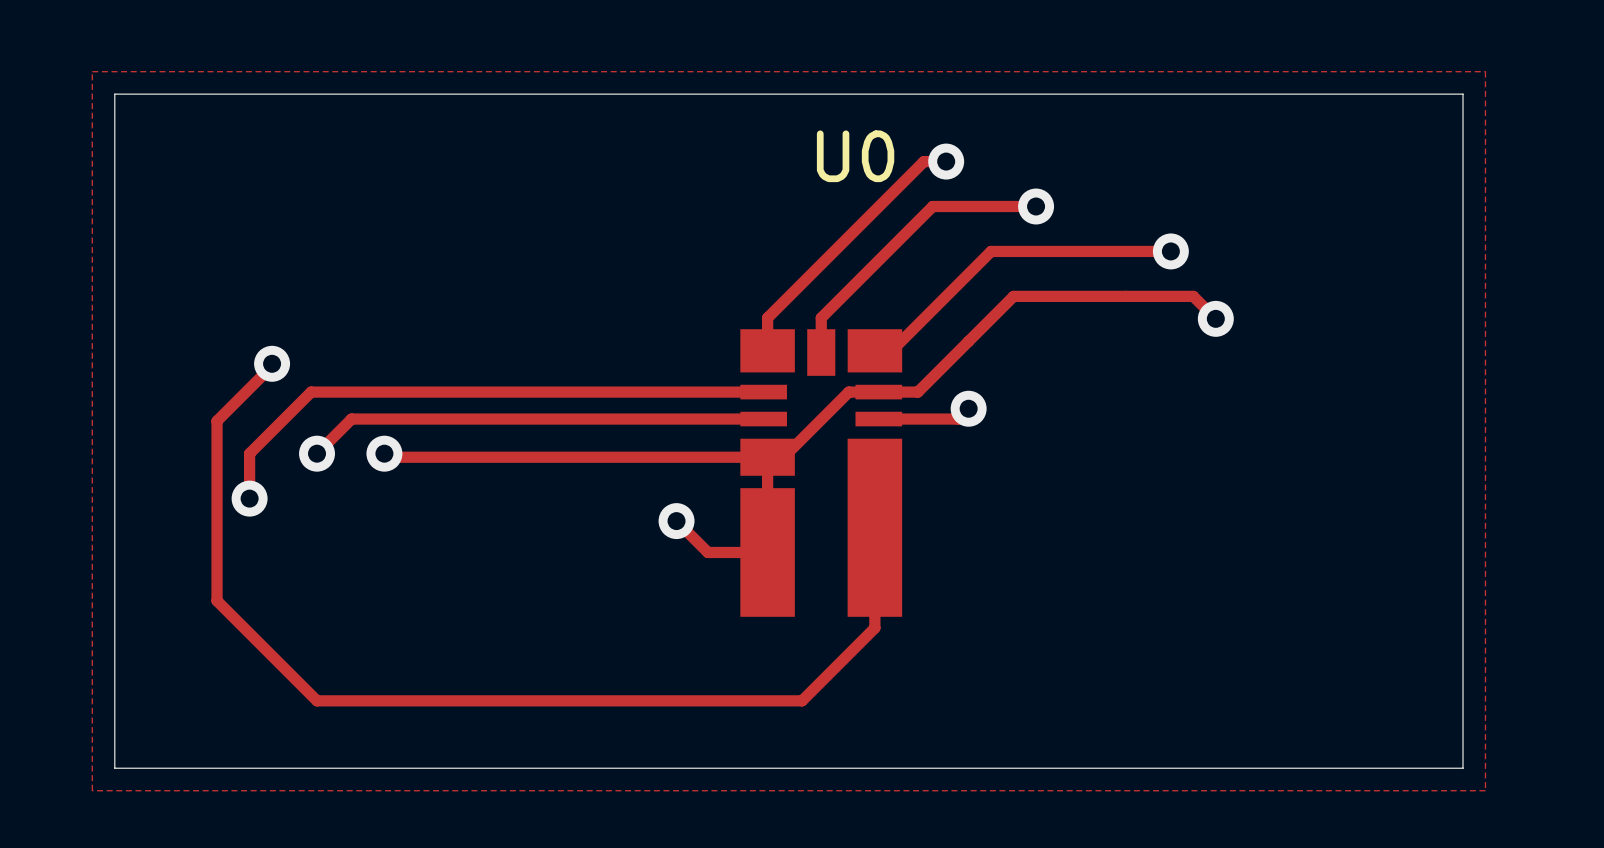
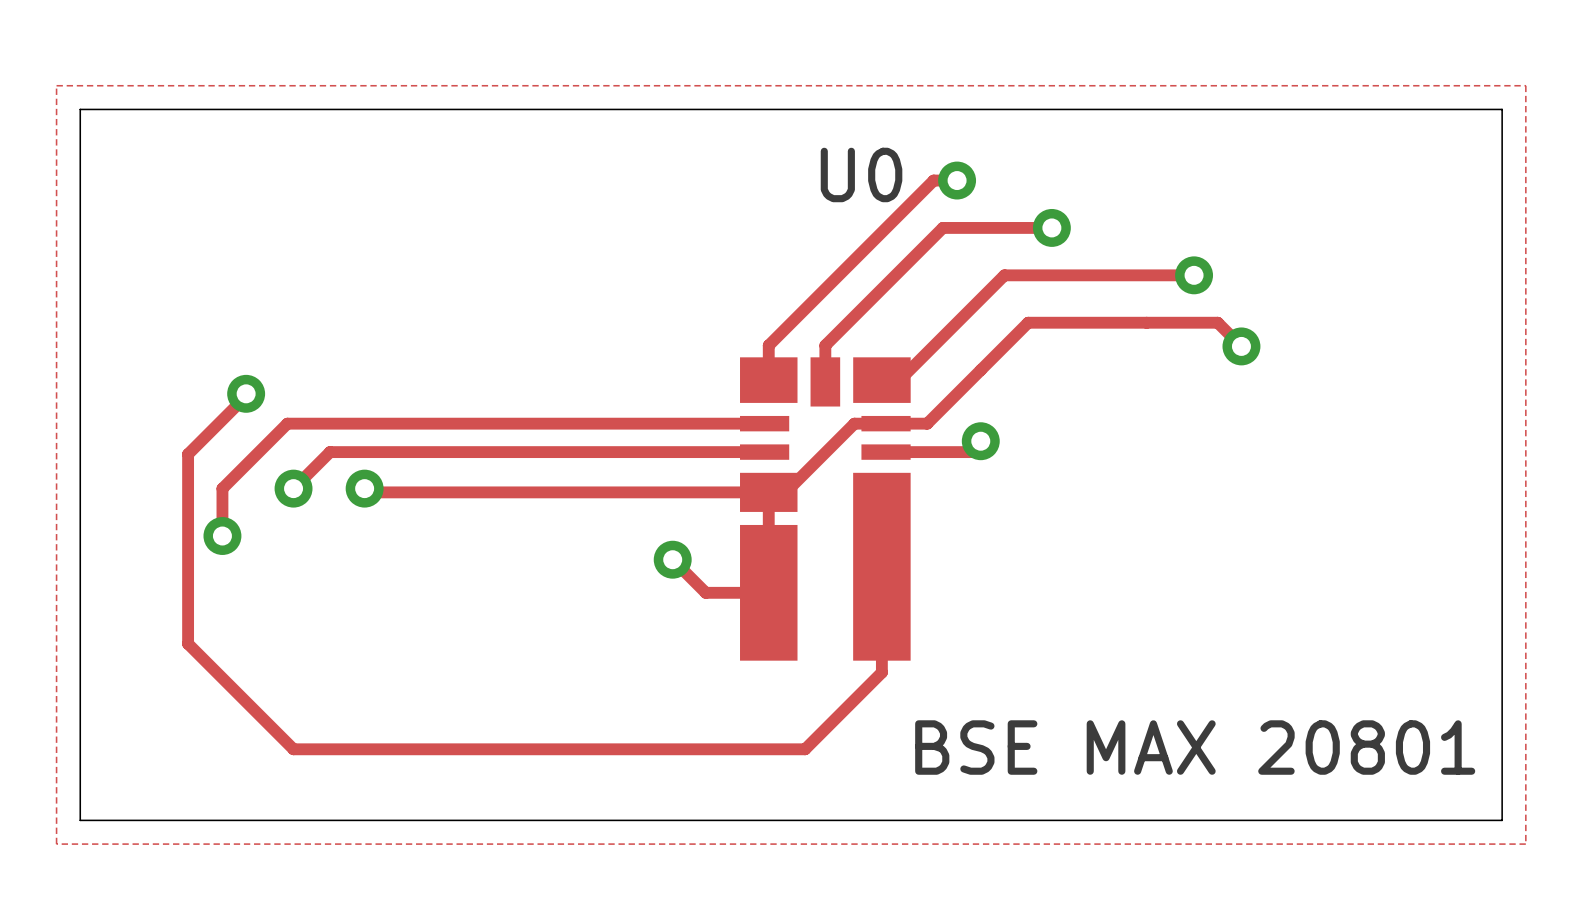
text: none -> BSE MAX 20801 (1195, 747)

